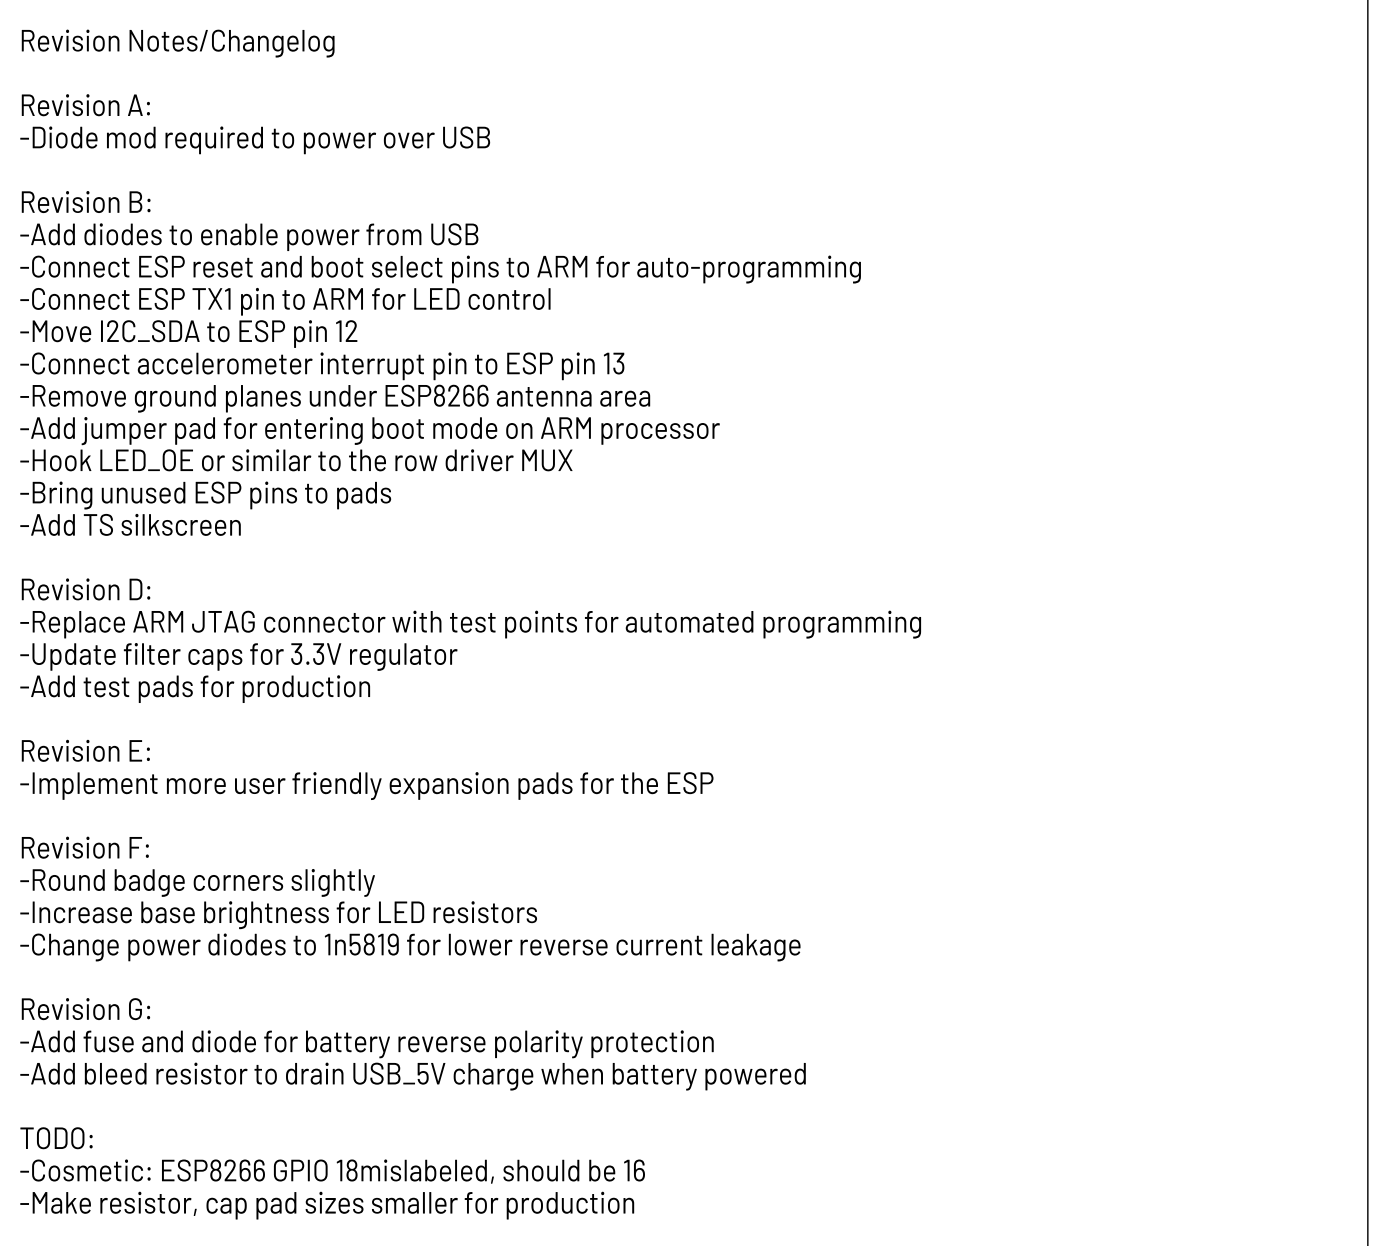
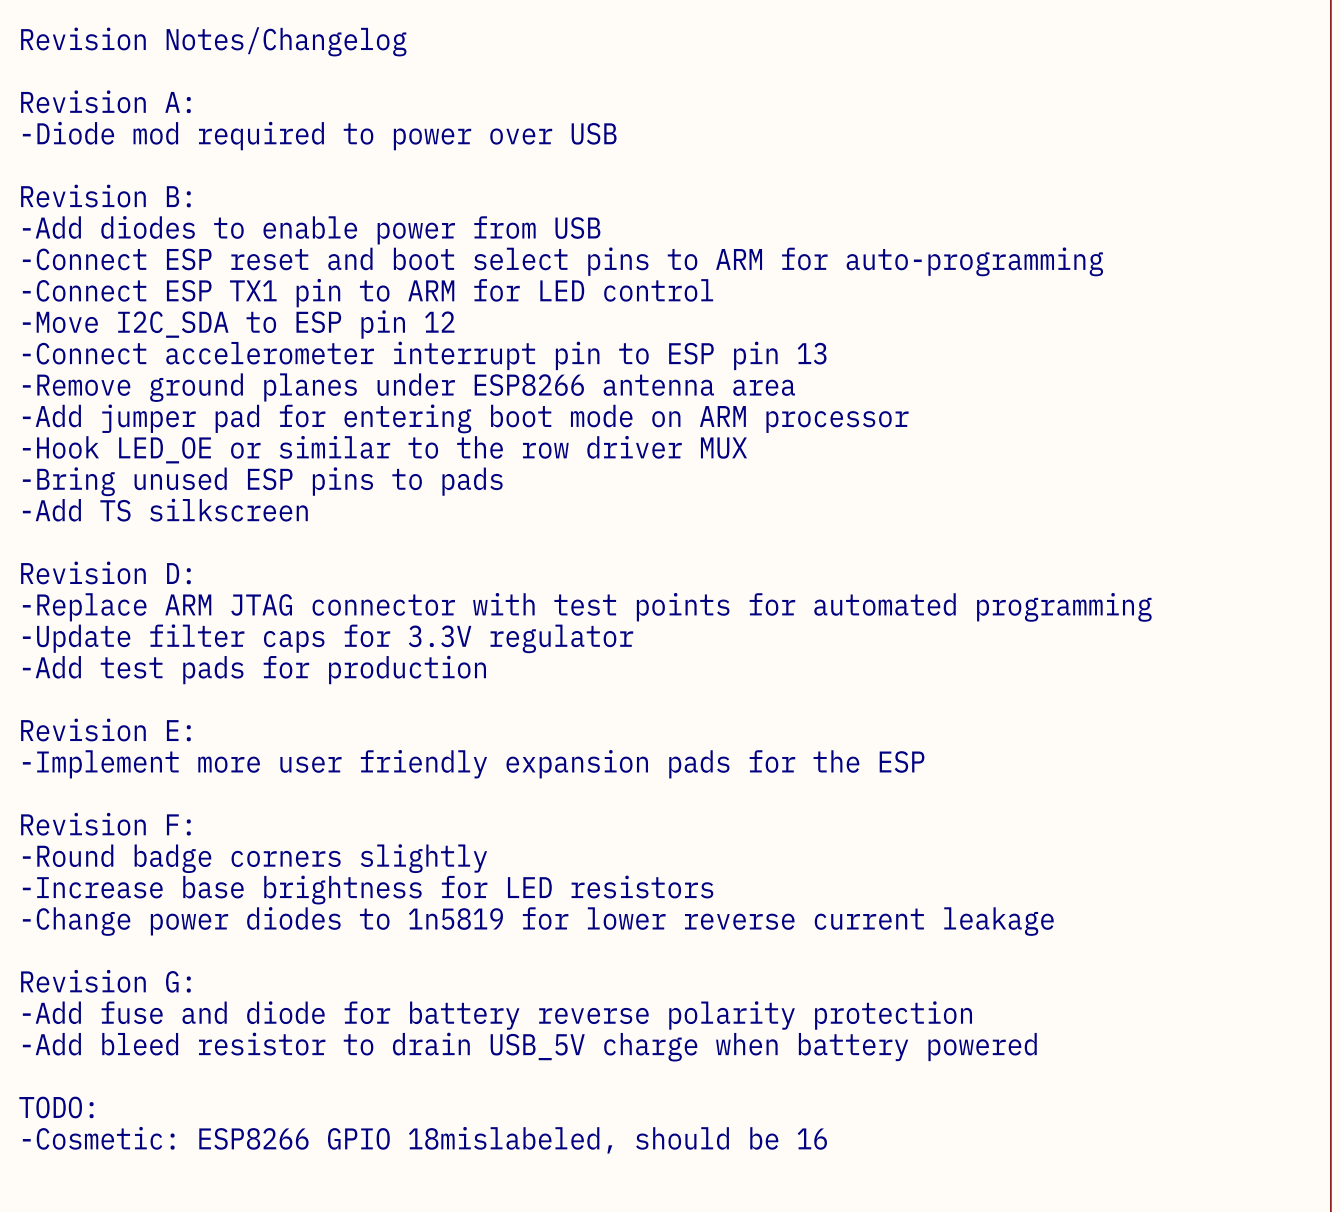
text: -Make resistor, cap pad sizes smaller for production (327, 1205) -> none

